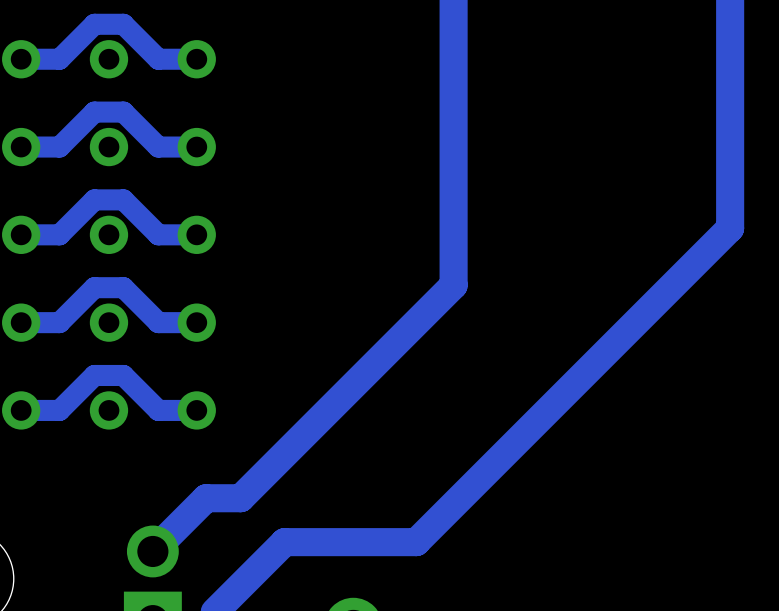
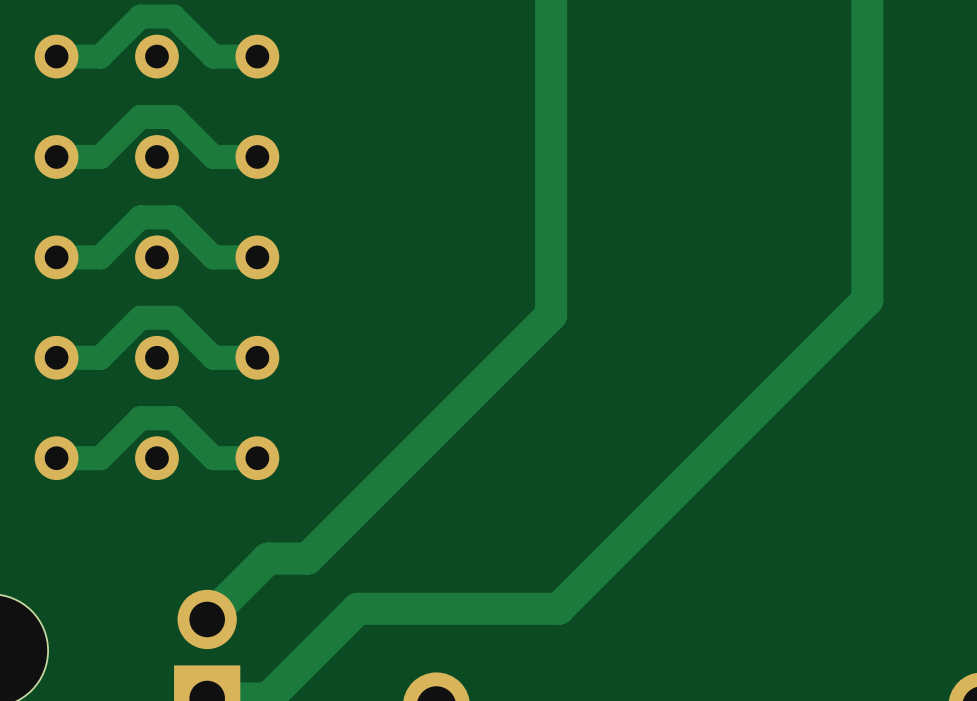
track: (730, 228) (416, 542) -> (867, 249) (867, 300) (558, 608) (508, 608)

